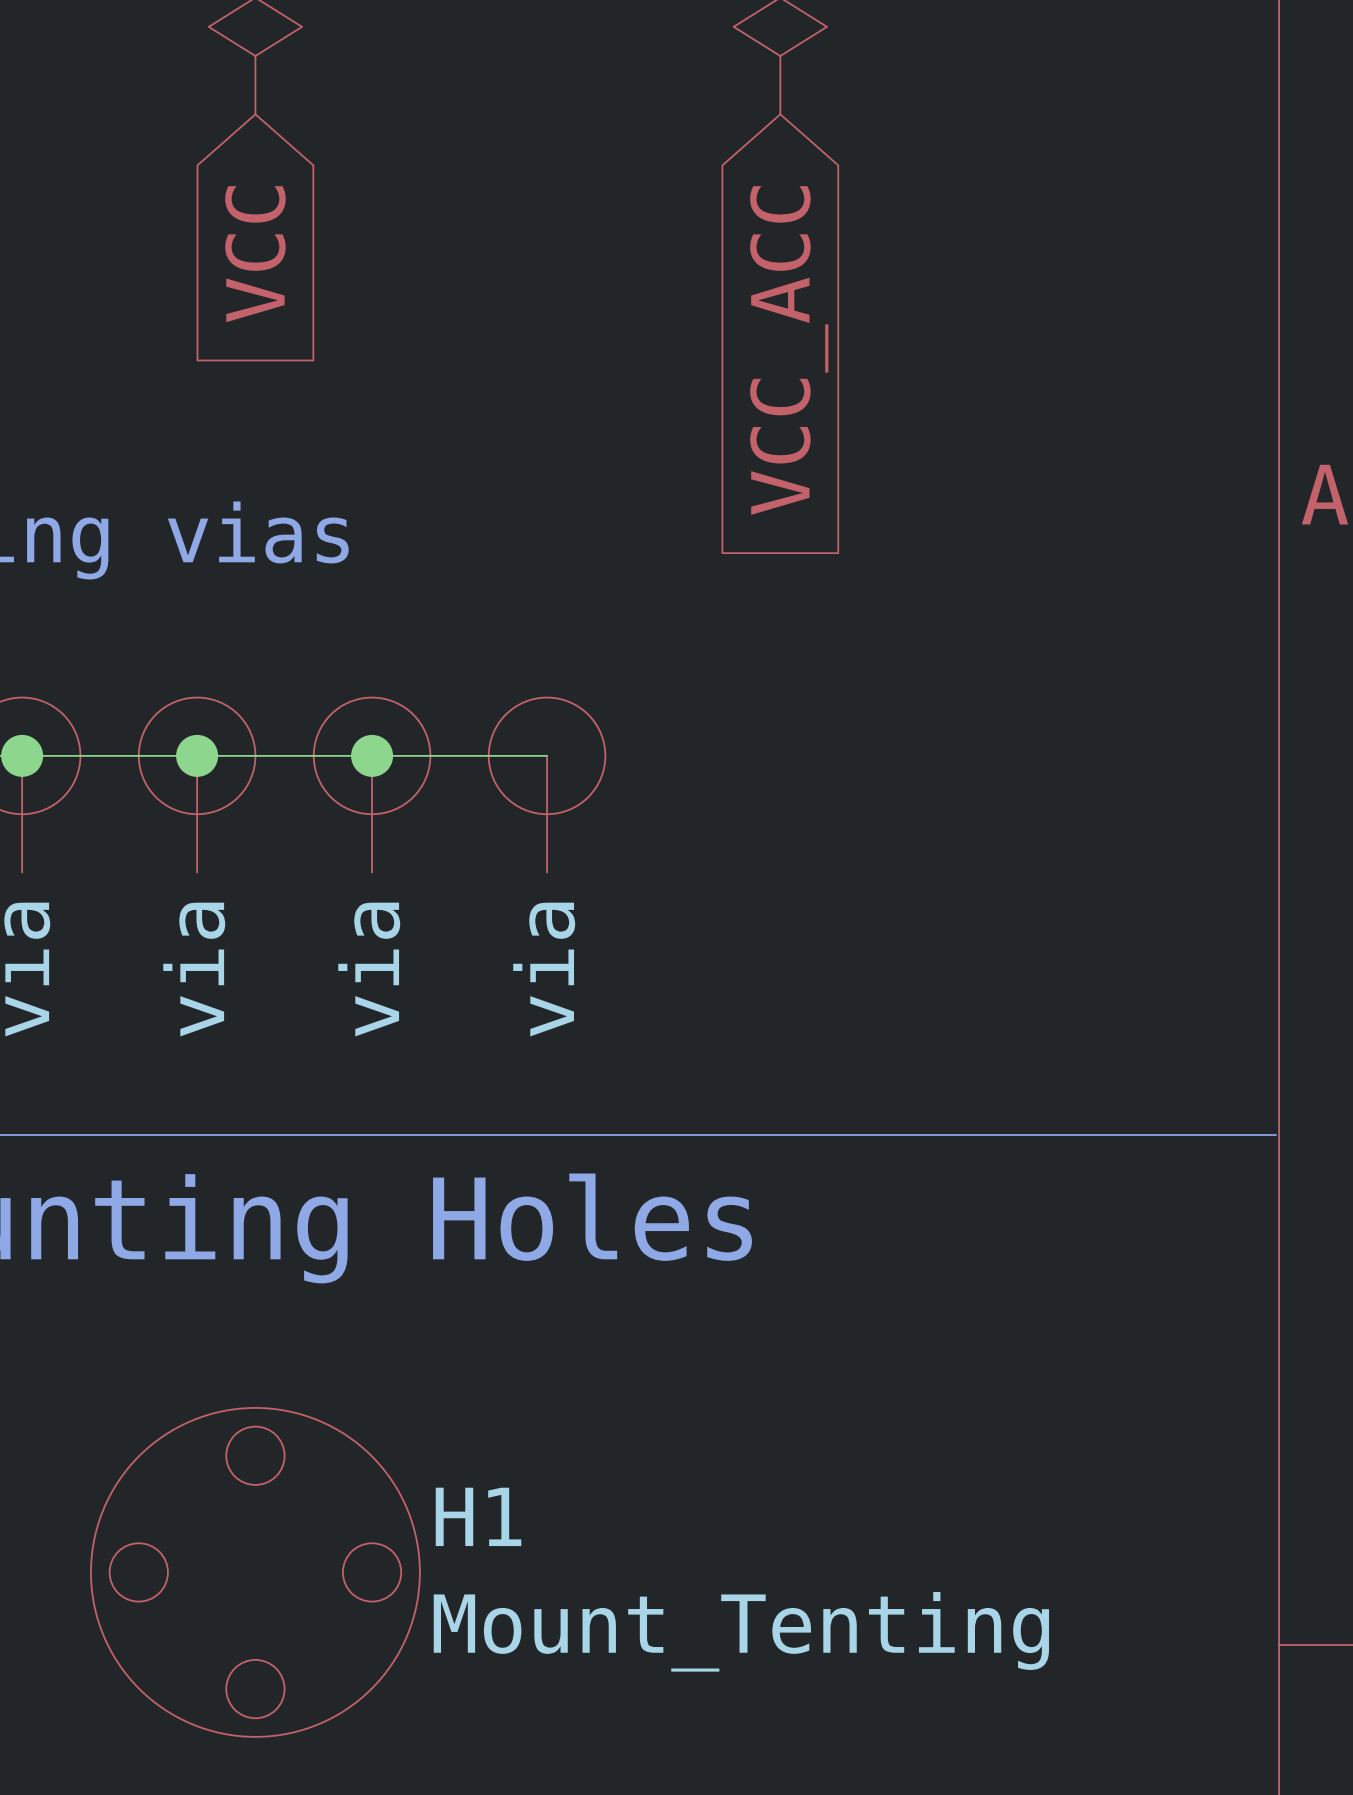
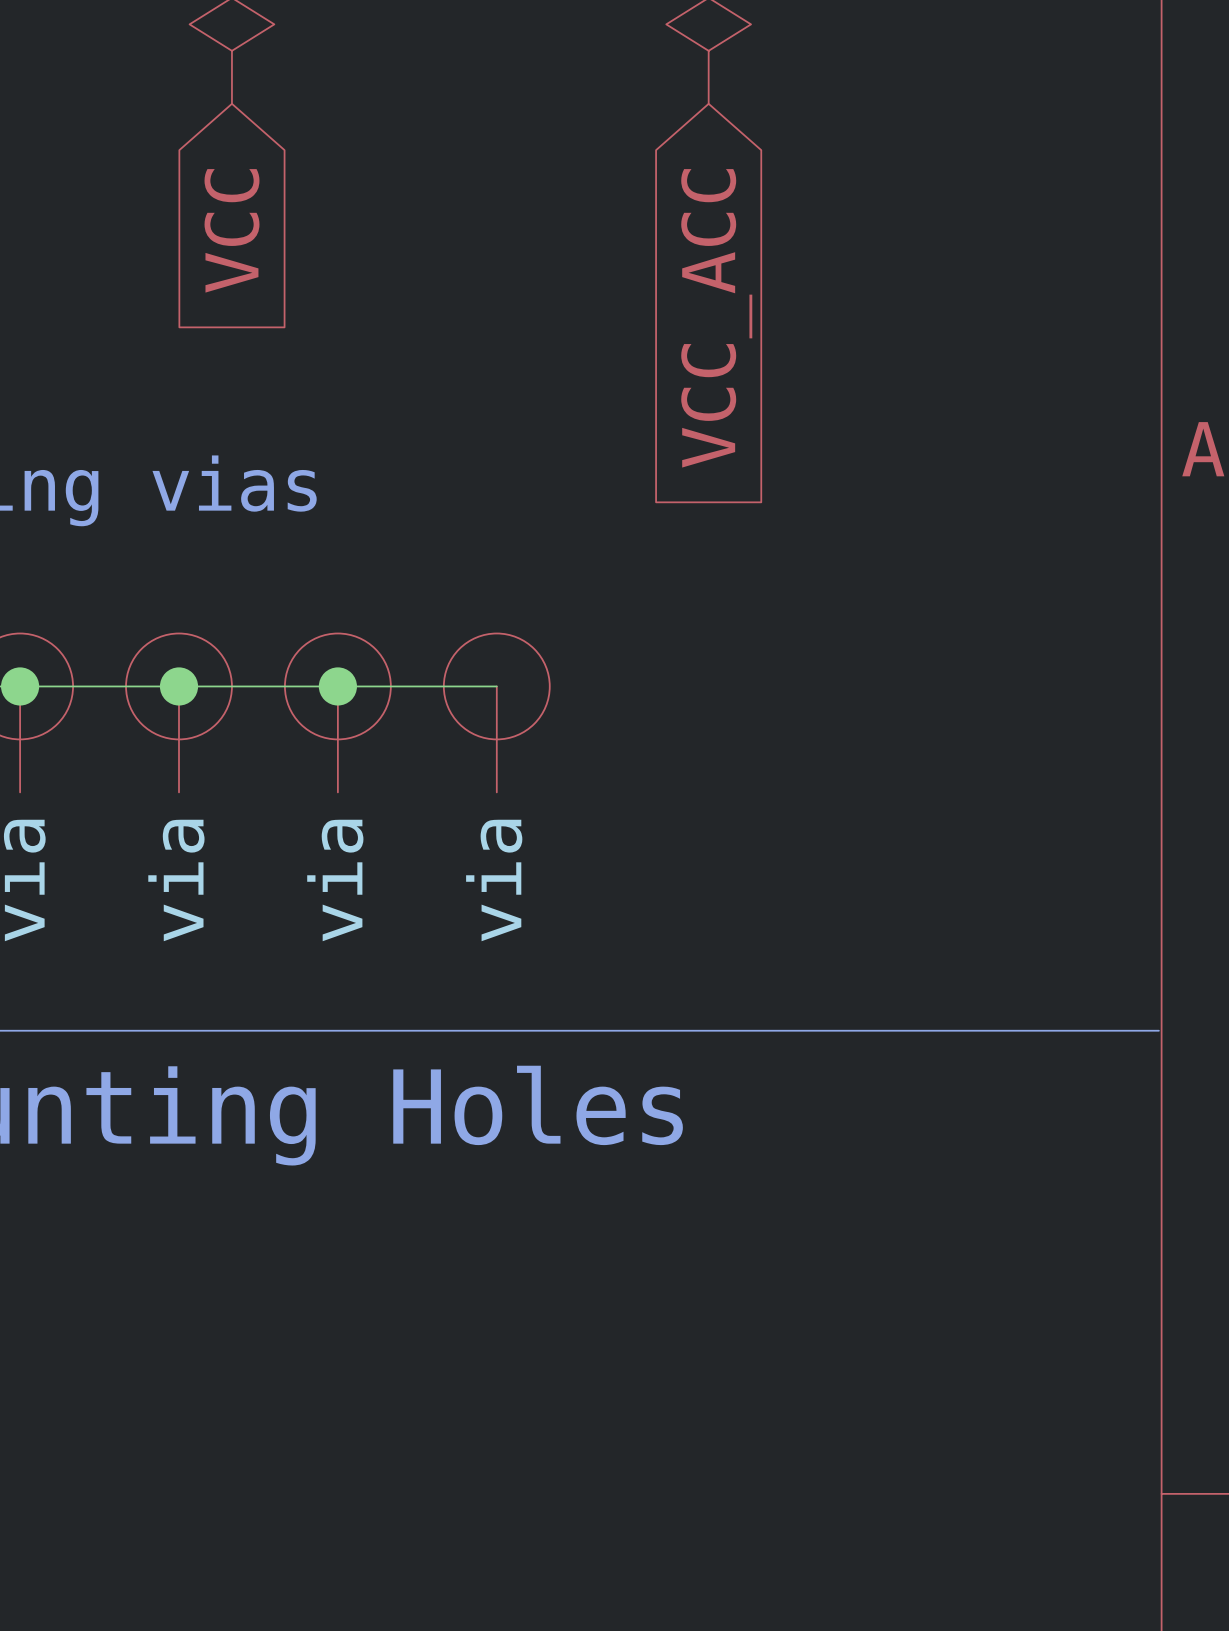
H1: Mount_Tenting (255, 1572) -> none

